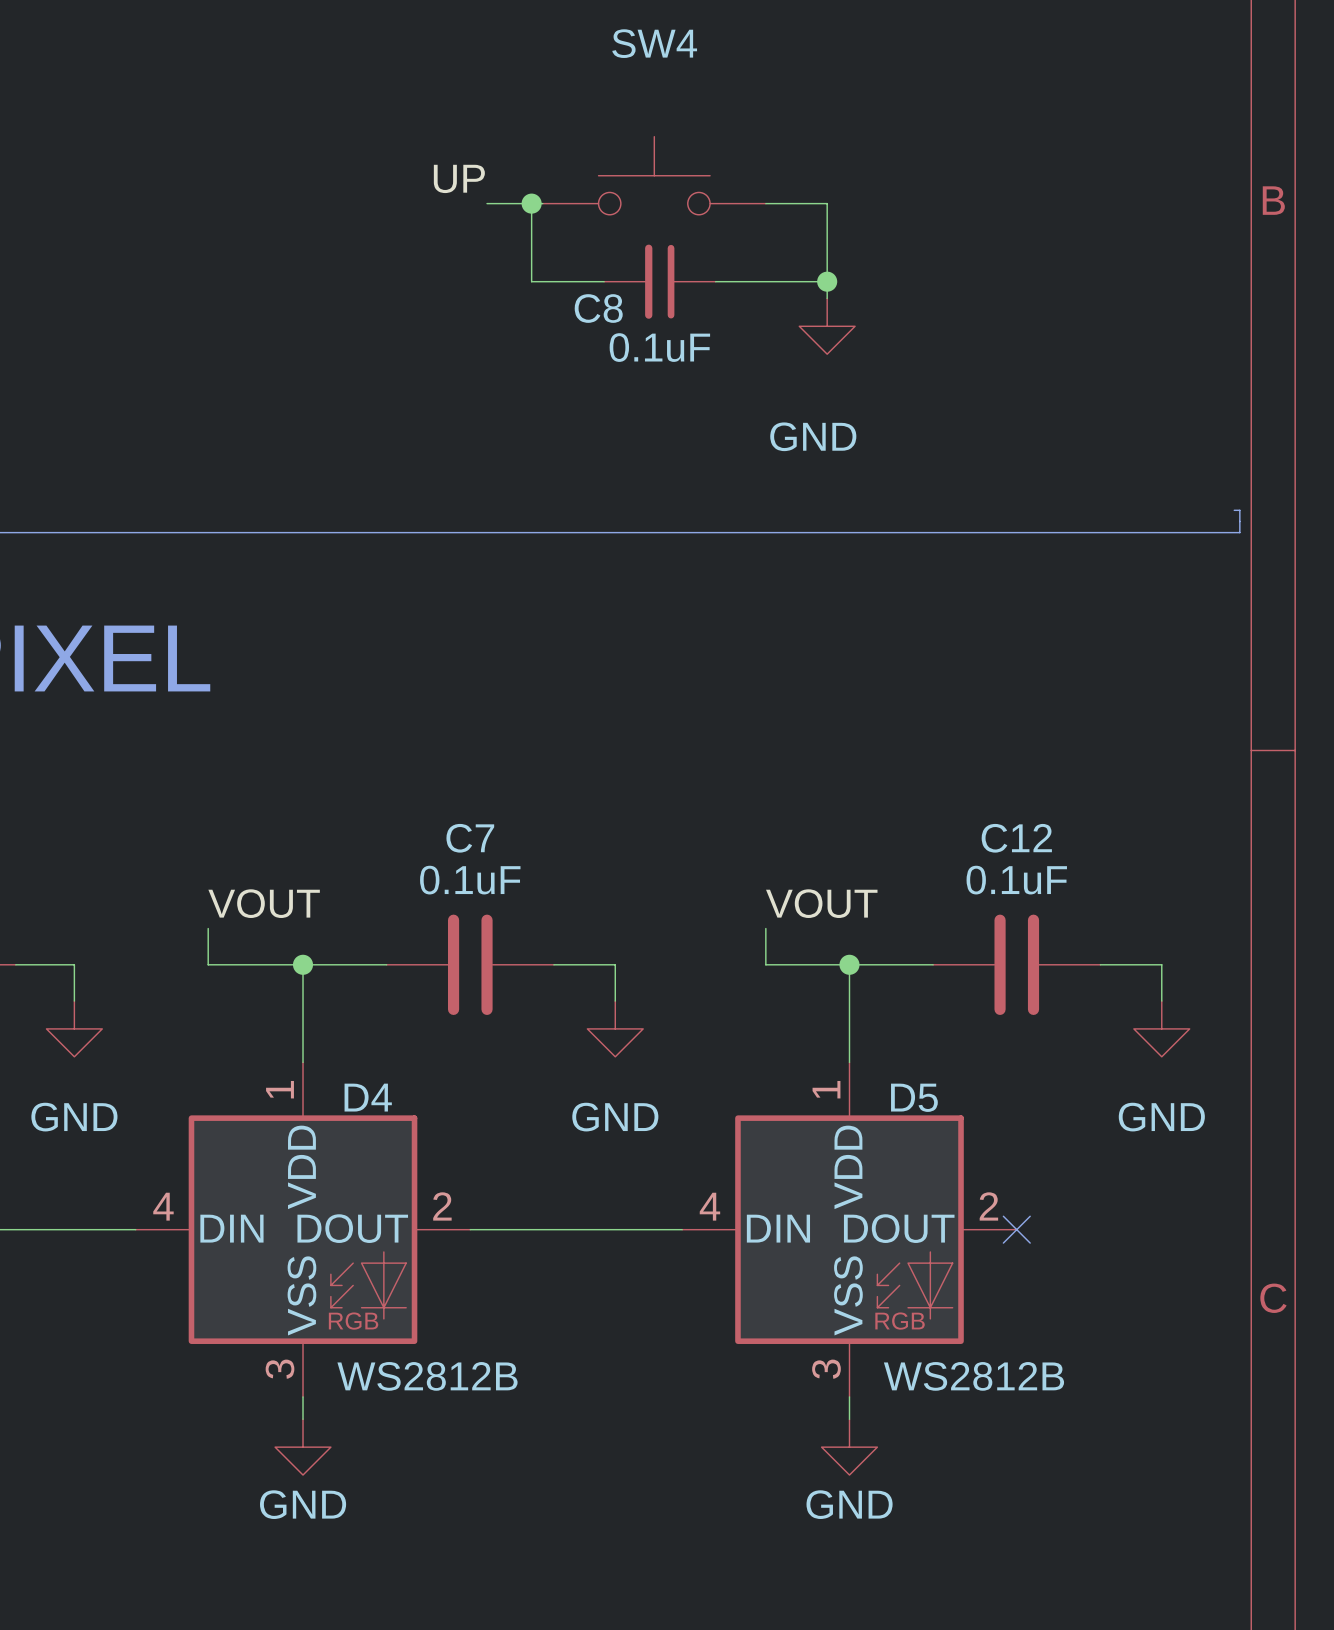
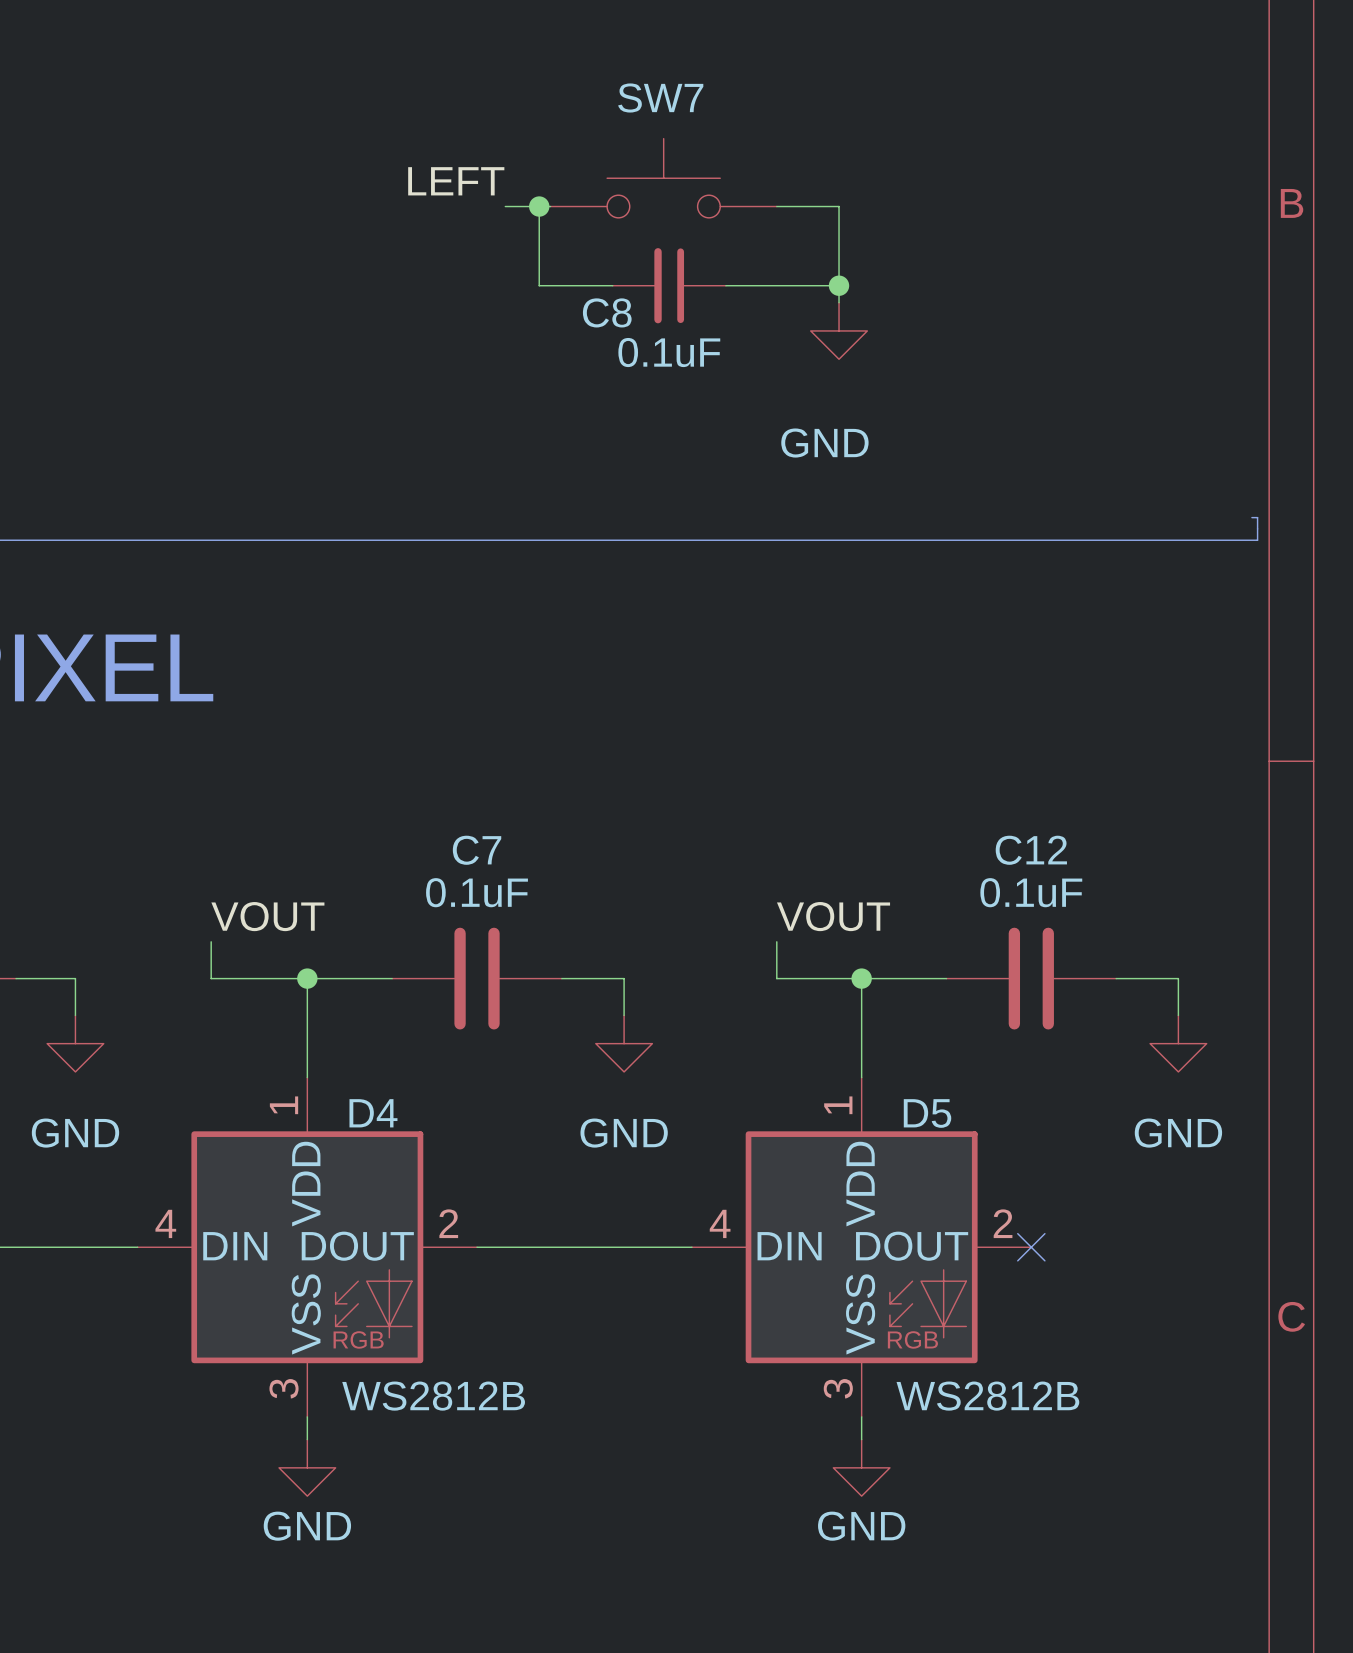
SW4 name: SW4 (654, 43) -> SW7 (660, 98)
label: UP (459, 178) -> LEFT (456, 181)
wire: (487, 203) (498, 203) -> none

